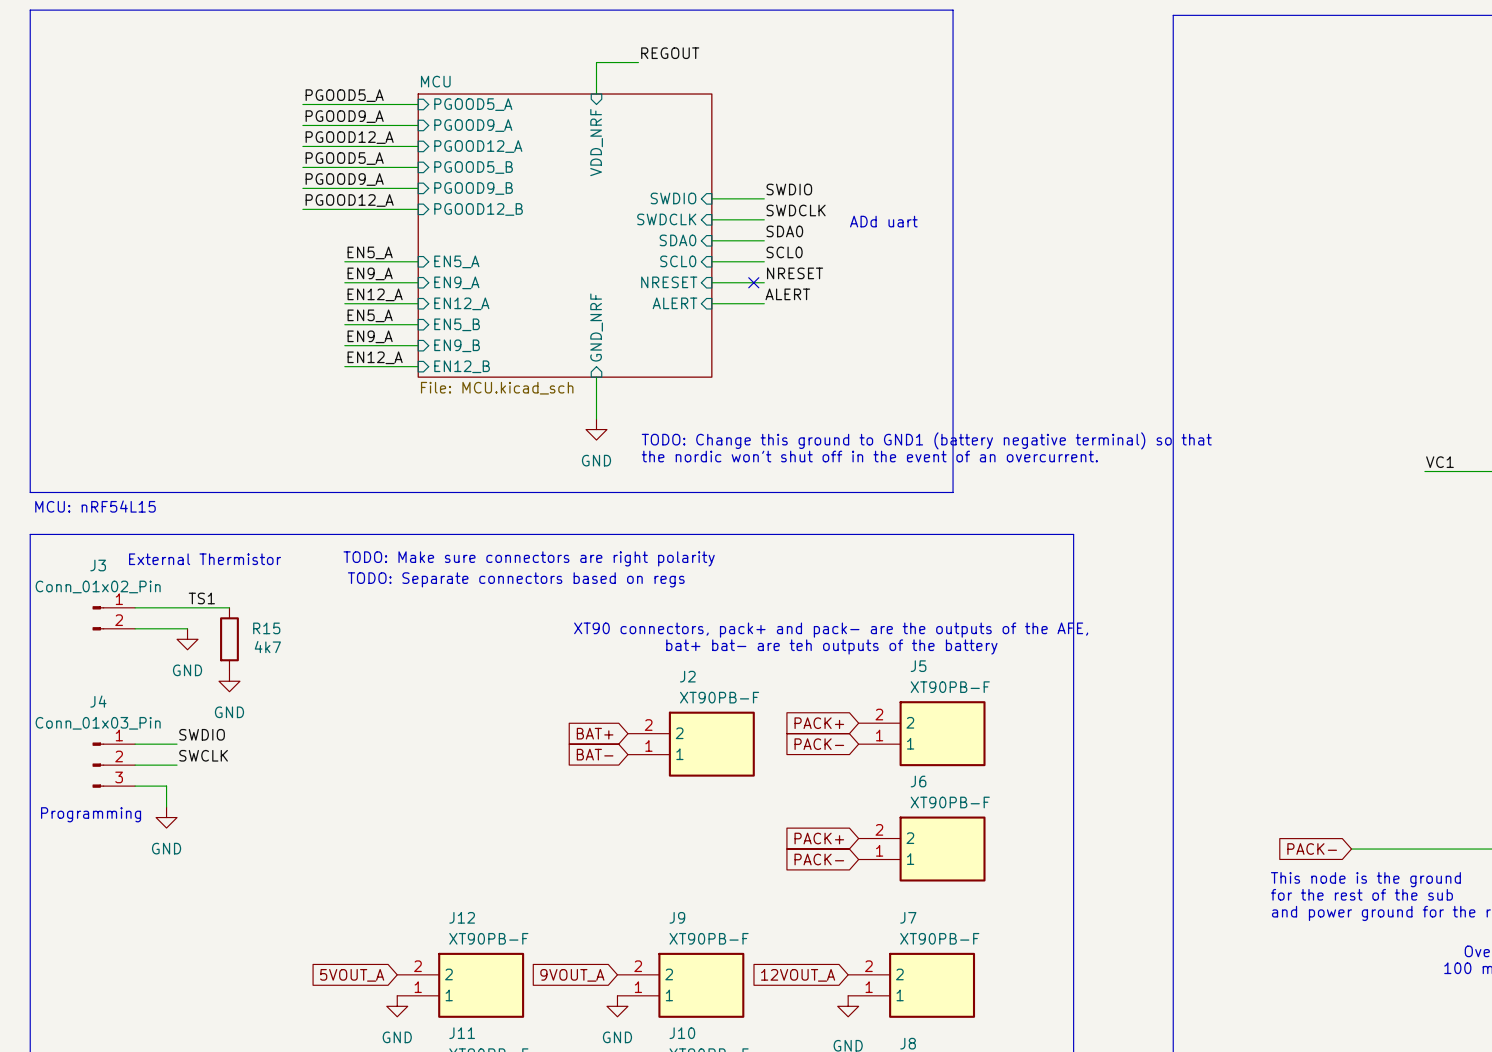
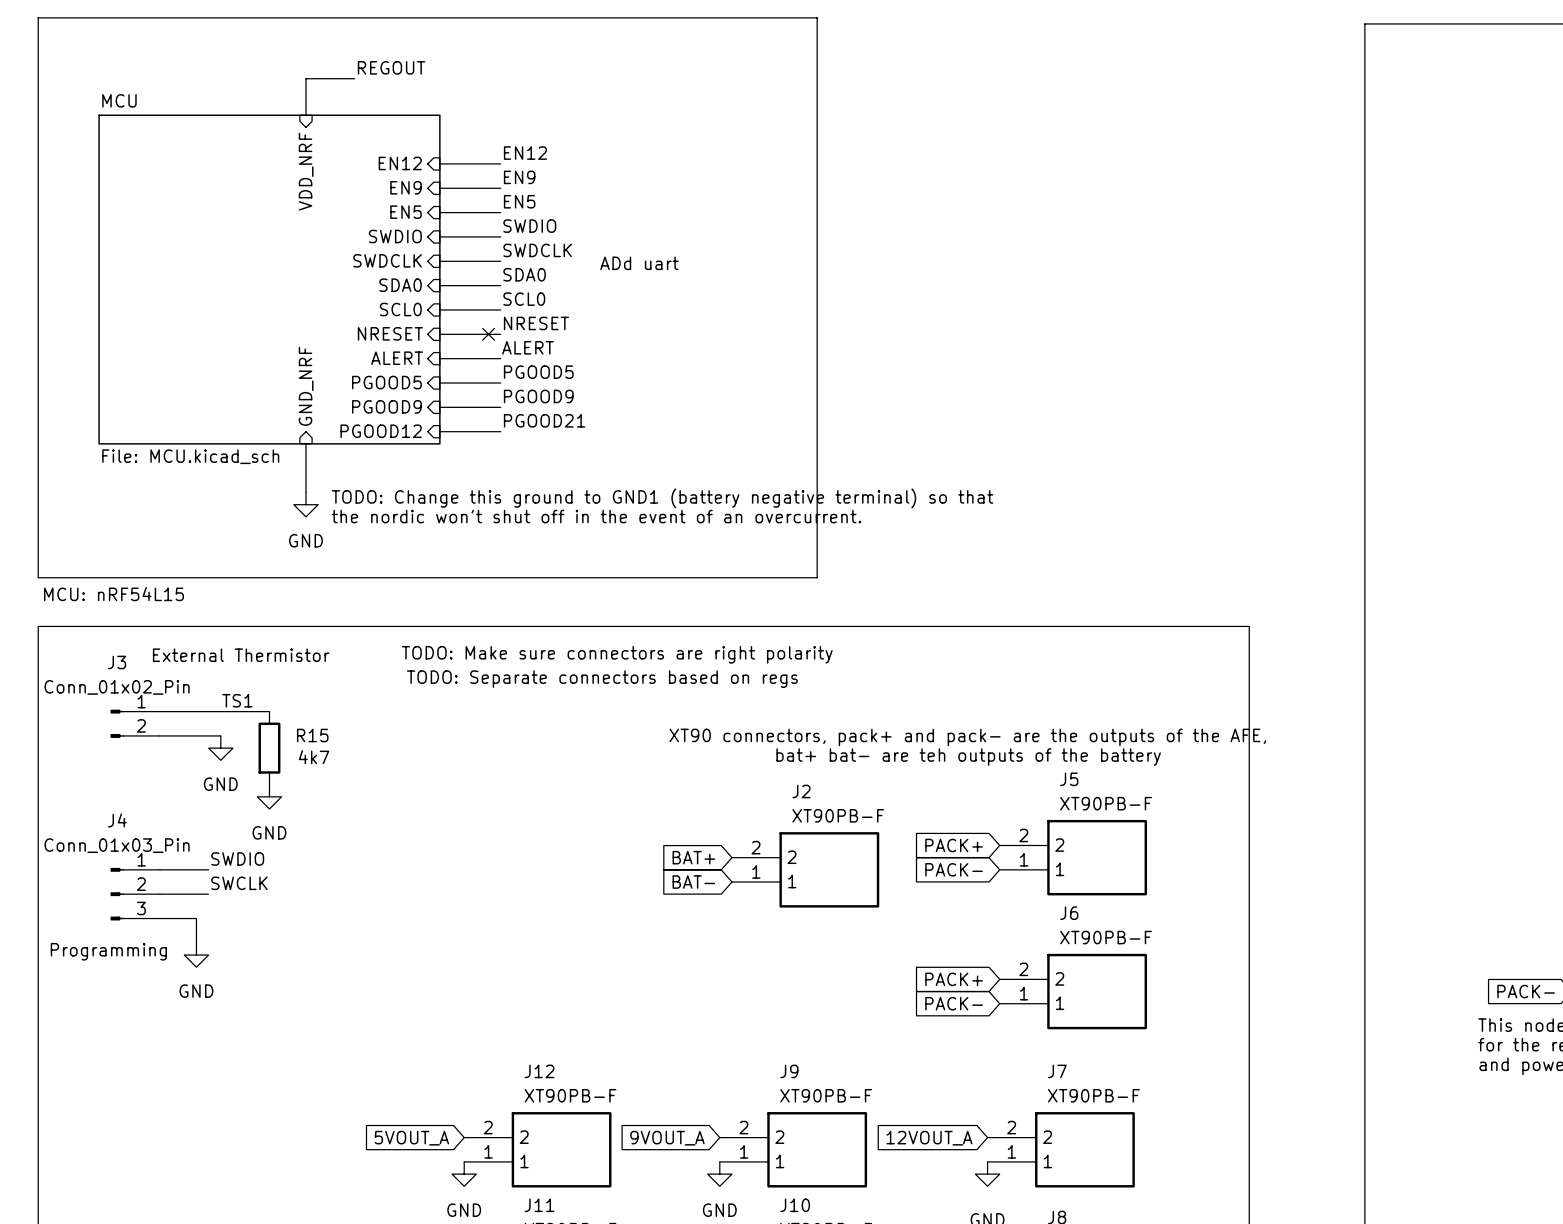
line: (701, 10) (953, 10) (953, 492) (701, 492) -> (817, 17) (817, 577)
label: none -> REGOUT (391, 67)
label: REGOUT (670, 53) -> none
wire: none -> (354, 78) (305, 78) (305, 115)
wire: (638, 62) (596, 62) (596, 94) -> none
label: PGOOD5_A (344, 95) -> none
wire: (302, 104) (418, 104) -> none
sheet pin: PGOOD5_A (473, 104) -> none
label: PGOOD9_A (344, 116) -> none
wire: (302, 125) (418, 125) -> none
sheet pin: PGOOD9_A (473, 125) -> none
label: none -> EN12 (525, 153)
sheet pin: none -> EN12 (400, 163)
wire: none -> (439, 163) (500, 163)
label: PGOOD12_A (349, 137) -> none
sheet pin: none -> VDD_NRF (306, 171)
sheet pin: VDD_NRF (596, 142) -> none
wire: (302, 146) (418, 146) -> none
sheet pin: PGOOD12_A (478, 146) -> none
label: none -> EN9 (519, 177)
sheet pin: none -> EN9 (406, 187)
wire: none -> (439, 188) (500, 188)
label: PGOOD5_A (344, 158) -> none
wire: (302, 167) (418, 167) -> none
sheet pin: PGOOD5_B (473, 167) -> none
label: none -> EN5 (519, 201)
sheet pin: none -> EN5 (406, 212)
wire: none -> (439, 212) (500, 212)
label: PGOOD9_A (344, 179) -> none
wire: (302, 188) (418, 188) -> none
sheet pin: PGOOD9_B (473, 188) -> none
label: none -> SWDIO (529, 226)
label: SWDIO (789, 189) -> none
sheet pin: none -> SWDIO (395, 236)
wire: none -> (439, 236) (500, 236)
sheet pin: SWDIO (673, 198) -> none
wire: (711, 198) (764, 198) -> none
label: PGOOD12_A (349, 200) -> none
wire: (302, 209) (418, 209) -> none
sheet pin: PGOOD12_B (478, 209) -> none
label: none -> SWDCLK (537, 250)
label: SWDCLK (796, 210) -> none
sheet pin: none -> SWDCLK (387, 260)
wire: none -> (439, 261) (500, 261)
sheet pin: SWDCLK (666, 219) -> none
wire: (711, 219) (764, 219) -> none
text: none -> ADd uart (639, 263)
text: ADd uart (883, 221) -> none
label: none -> SDA0 (524, 274)
label: SDA0 (784, 231) -> none
sheet MCU: none -> File: MCU.kicad_sch (269, 279)
sheet MCU: File: MCU.kicad_sch (565, 235) -> none
sheet pin: none -> SDA0 (400, 285)
wire: none -> (439, 285) (500, 285)
sheet pin: SDA0 (677, 240) -> none
wire: (711, 240) (764, 240) -> none
label: EN5_A (370, 252) -> none
label: none -> SCL0 (524, 299)
label: SCL0 (784, 252) -> none
sheet pin: none -> SCL0 (400, 309)
wire: (344, 261) (376, 261) -> none
wire: none -> (488, 309) (500, 309)
sheet pin: EN5_A (456, 261) -> none
sheet pin: SCL0 (678, 261) -> none
wire: (711, 261) (764, 261) -> none
label: EN9_A (370, 273) -> none
label: none -> NRESET (536, 323)
label: NRESET (795, 273) -> none
sheet pin: none -> NRESET (390, 333)
wire: (344, 282) (376, 282) -> none
wire: none -> (488, 334) (500, 334)
no-connect mark: none -> (488, 334)
sheet pin: EN9_A (456, 282) -> none
sheet pin: NRESET (669, 282) -> none
wire: (711, 282) (764, 282) -> none
no-connect mark: (753, 282) -> none
label: EN12_A (375, 294) -> none
label: none -> ALERT (528, 347)
label: ALERT (787, 294) -> none
sheet pin: none -> ALERT (397, 358)
wire: (344, 303) (376, 303) -> none
wire: none -> (488, 358) (500, 358)
sheet pin: EN12_A (461, 303) -> none
sheet pin: ALERT (674, 303) -> none
wire: (711, 303) (764, 303) -> none
label: EN5_A (370, 315) -> none
label: none -> PGOOD5 (538, 372)
sheet pin: none -> PGOOD5 (386, 382)
wire: (344, 324) (376, 324) -> none
wire: none -> (488, 383) (500, 383)
sheet pin: EN5_B (457, 324) -> none
sheet pin: none -> GND_NRF (306, 386)
sheet pin: GND_NRF (596, 327) -> none
label: EN9_A (370, 336) -> none
label: none -> PGOOD9 (538, 396)
sheet pin: none -> PGOOD9 (386, 406)
wire: (344, 345) (376, 345) -> none
wire: none -> (488, 407) (500, 407)
sheet pin: EN9_B (457, 345) -> none
label: EN12_A (375, 357) -> none
label: none -> PGOOD21 (544, 420)
sheet pin: none -> PGOOD12 (381, 431)
wire: (344, 366) (376, 366) -> none
wire: none -> (488, 431) (500, 431)
sheet pin: EN12_B (462, 366) -> none
wire: none -> (305, 443) (305, 492)
wire: (596, 377) (596, 419) -> none
text: none -> TODO: Change this ground to GND1 (battery negative terminal) so that (662, 498)
power symbol: none -> GND (305, 504)
power symbol: GND (596, 429) -> none
text: none -> the nordic won't shut off in the event of an overcurrent. (596, 516)
text: TODO: Change this ground to GND1 (battery negative terminal) so that (926, 440) -> none
text: the nordic won't shut off in the event of an overcurrent. (869, 456) -> none

